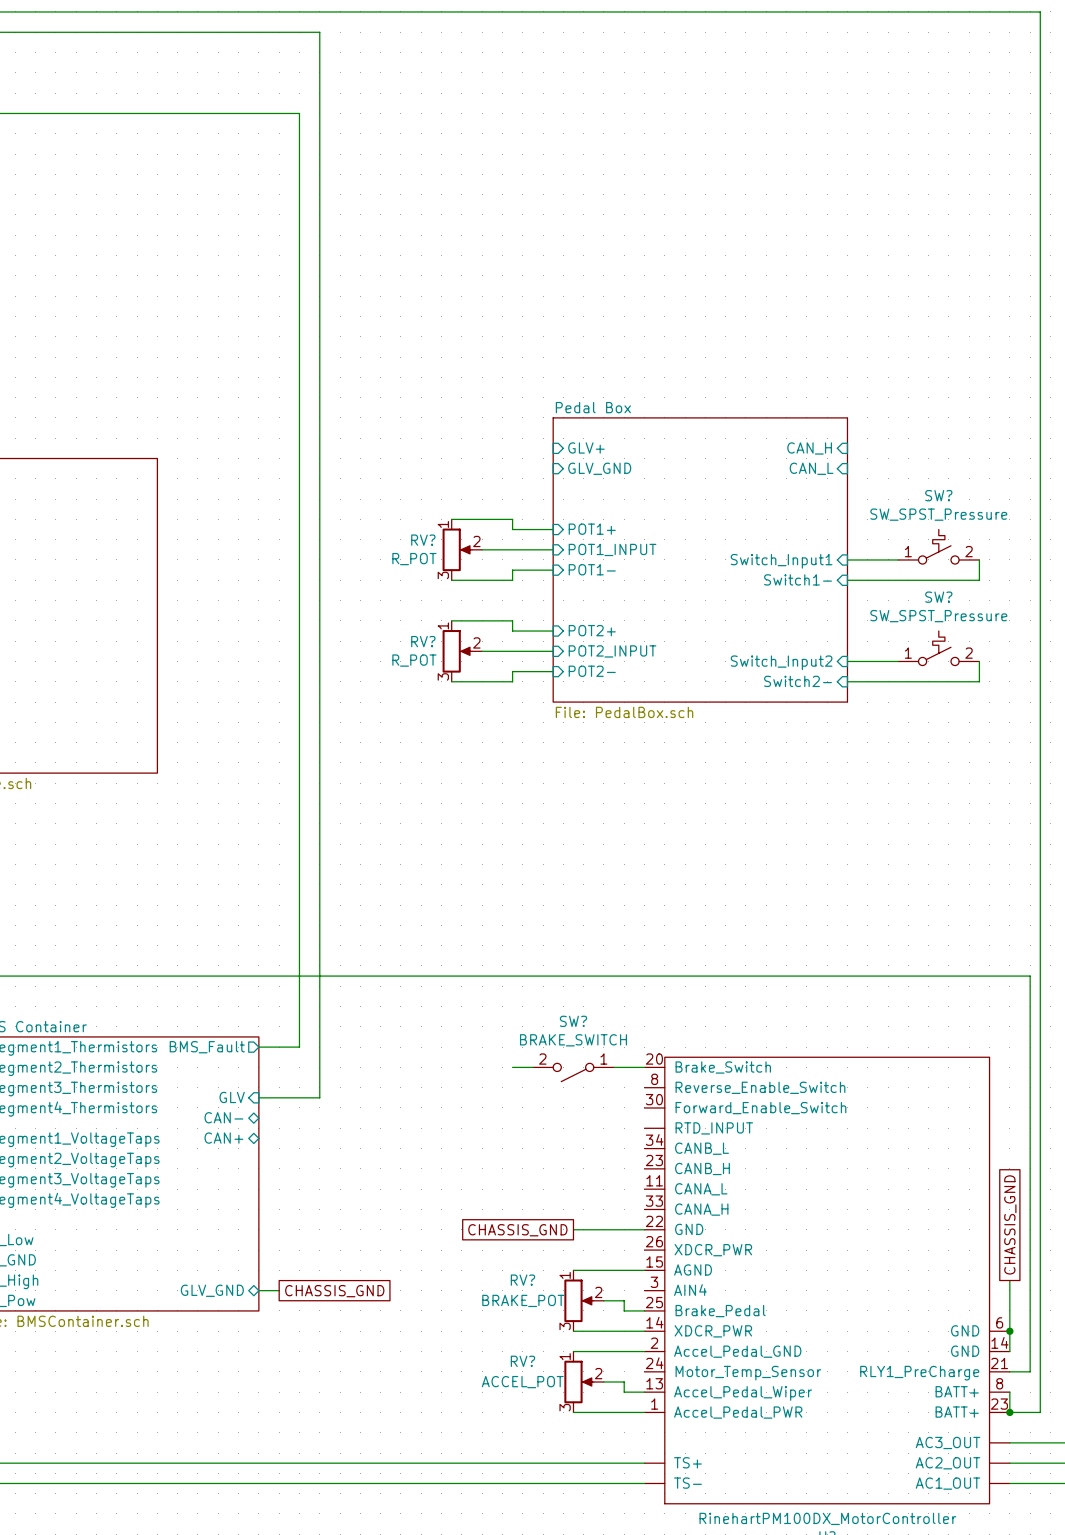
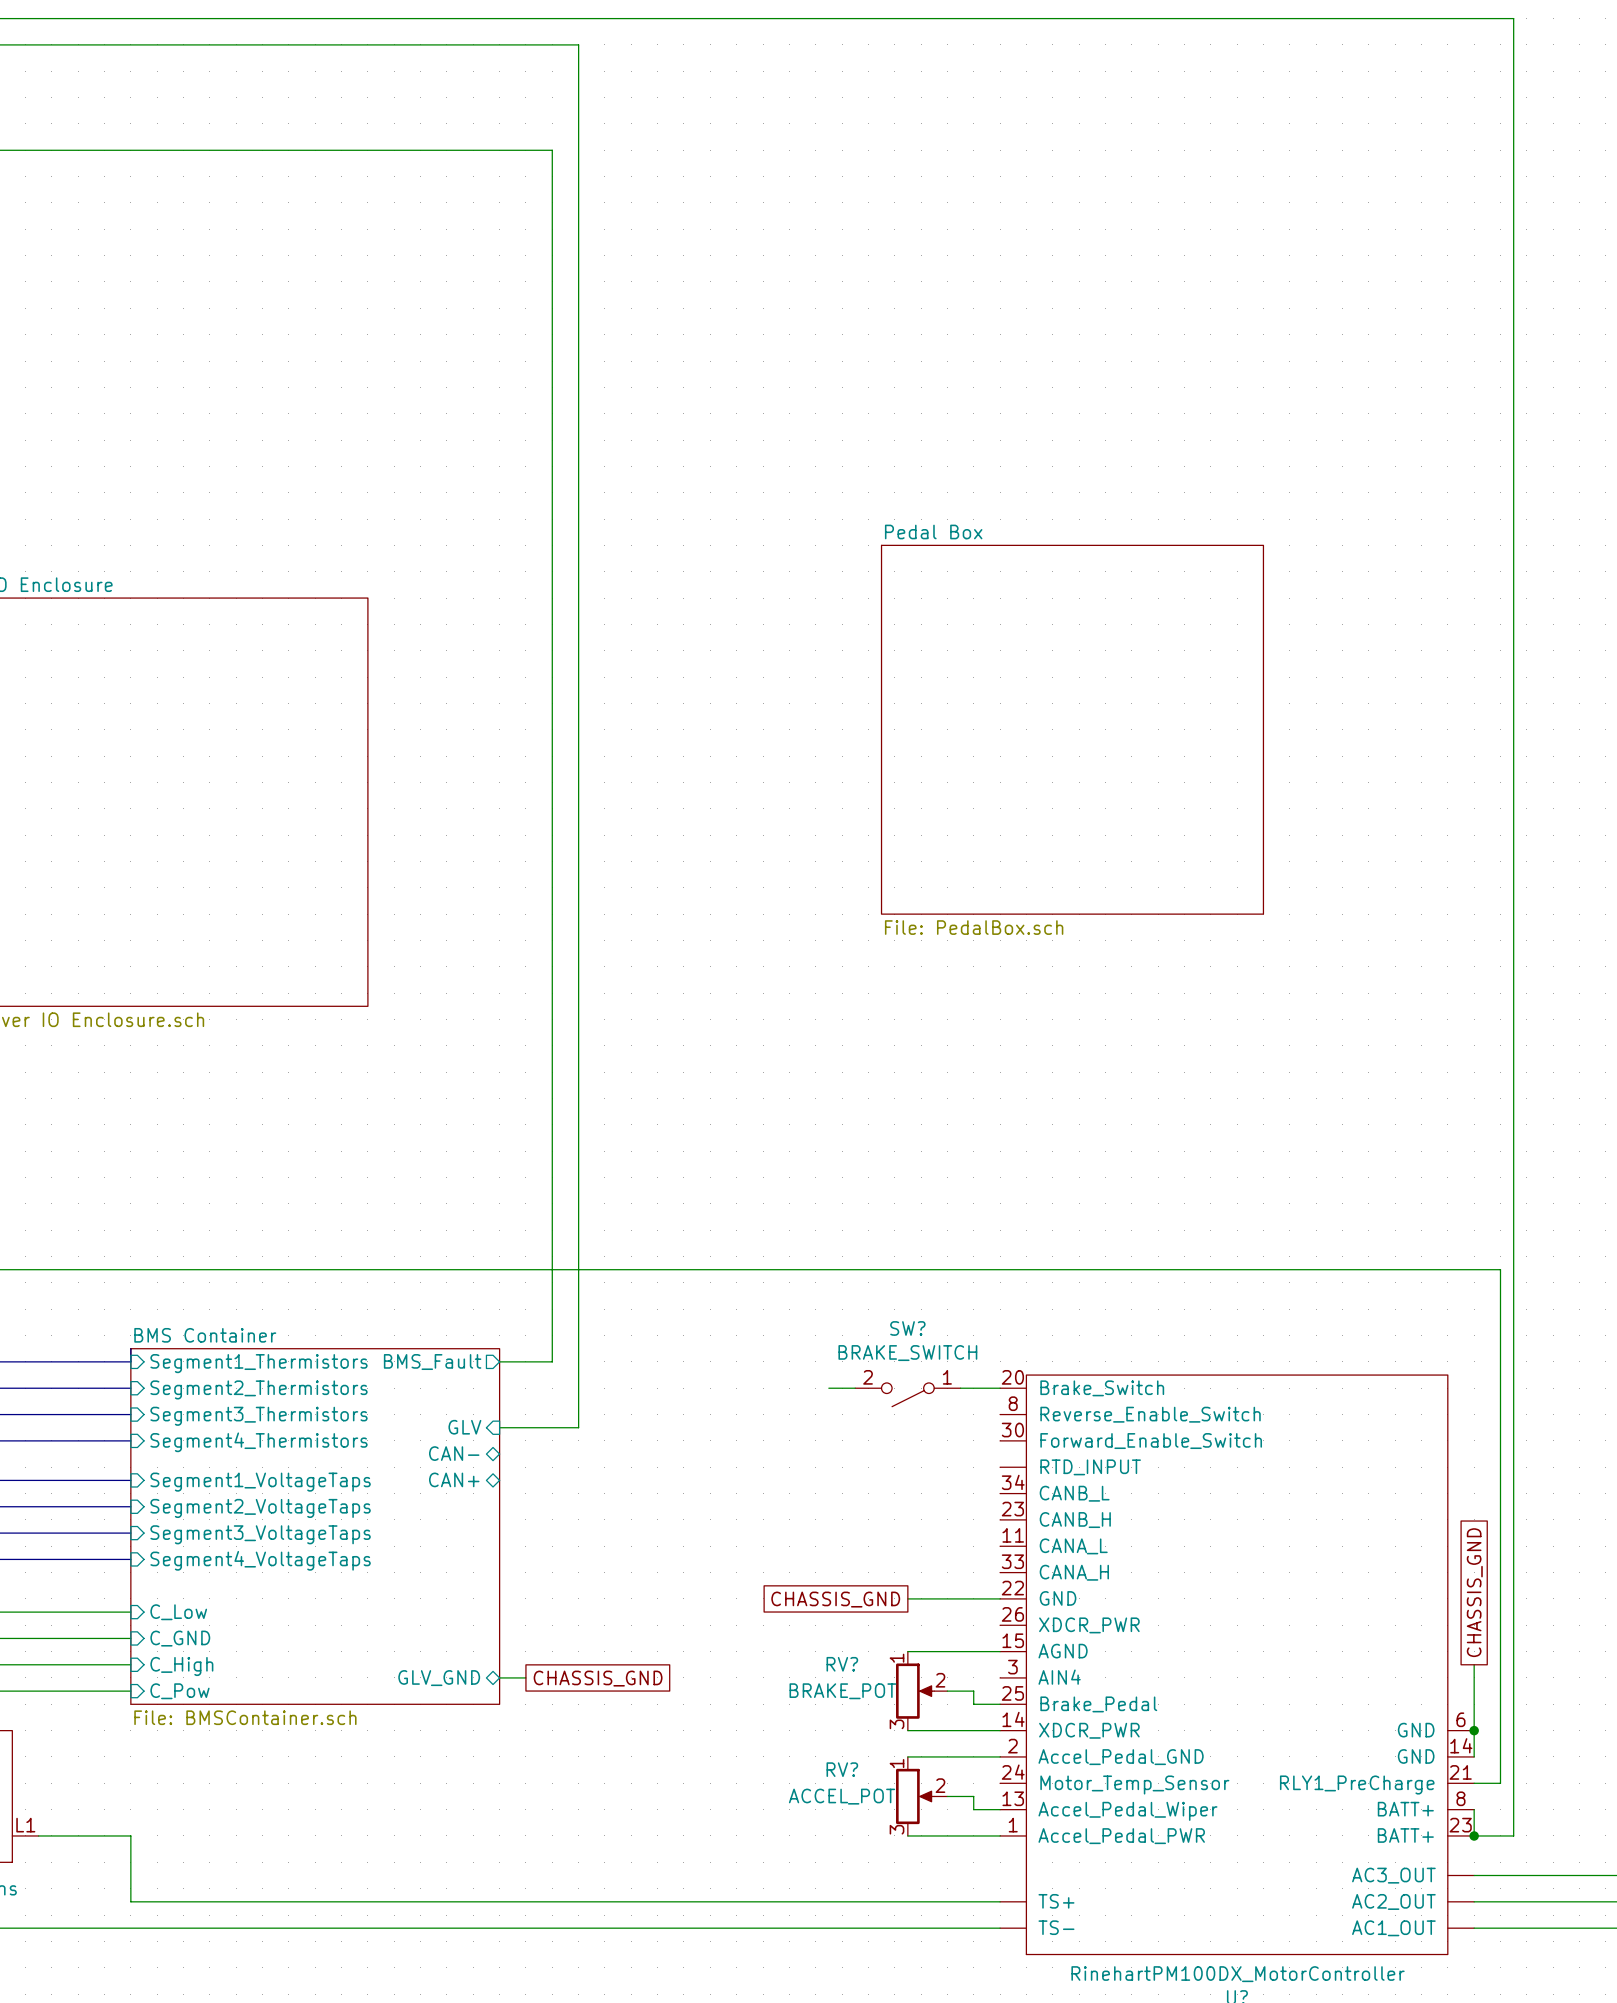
sheet pin: GLV+ (586, 447) -> none
sheet pin: CAN_H (809, 448) -> none
sheet pin: GLV_GND (599, 468) -> none
sheet pin: CAN_L (811, 468) -> none
wire: (451, 519) (512, 519) (512, 529) (553, 529) -> none
sheet pin: POT1+ (592, 529) -> none
SW?: SW_SPST_Pressure (938, 546) -> none
RV?: R_POT (462, 549) -> none
wire: (482, 549) (553, 549) -> none
sheet pin: POT1_INPUT (612, 549) -> none
wire: (847, 559) (898, 559) -> none
wire: (979, 559) (979, 580) (847, 580) -> none
sheet pin: Switch_Input1 (781, 561) -> none
sheet pin: POT1- (592, 569) -> none
wire: (553, 570) (512, 570) (512, 580) (451, 580) -> none
sheet pin: Switch1- (798, 579) -> none
wire: (451, 620) (512, 620) (512, 631) (553, 631) -> none
sheet pin: POT2+ (592, 630) -> none
SW?: SW_SPST_Pressure (938, 648) -> none
RV?: R_POT (462, 651) -> none
wire: (482, 651) (553, 651) -> none
sheet pin: POT2_INPUT (612, 651) -> none
wire: (847, 661) (898, 661) -> none
wire: (979, 661) (979, 681) (847, 681) -> none
sheet pin: Switch_Input2 (781, 662) -> none
wire: (553, 671) (512, 671) (512, 681) (451, 681) -> none
sheet pin: POT2- (592, 671) -> none
sheet pin: Switch2- (798, 681) -> none

